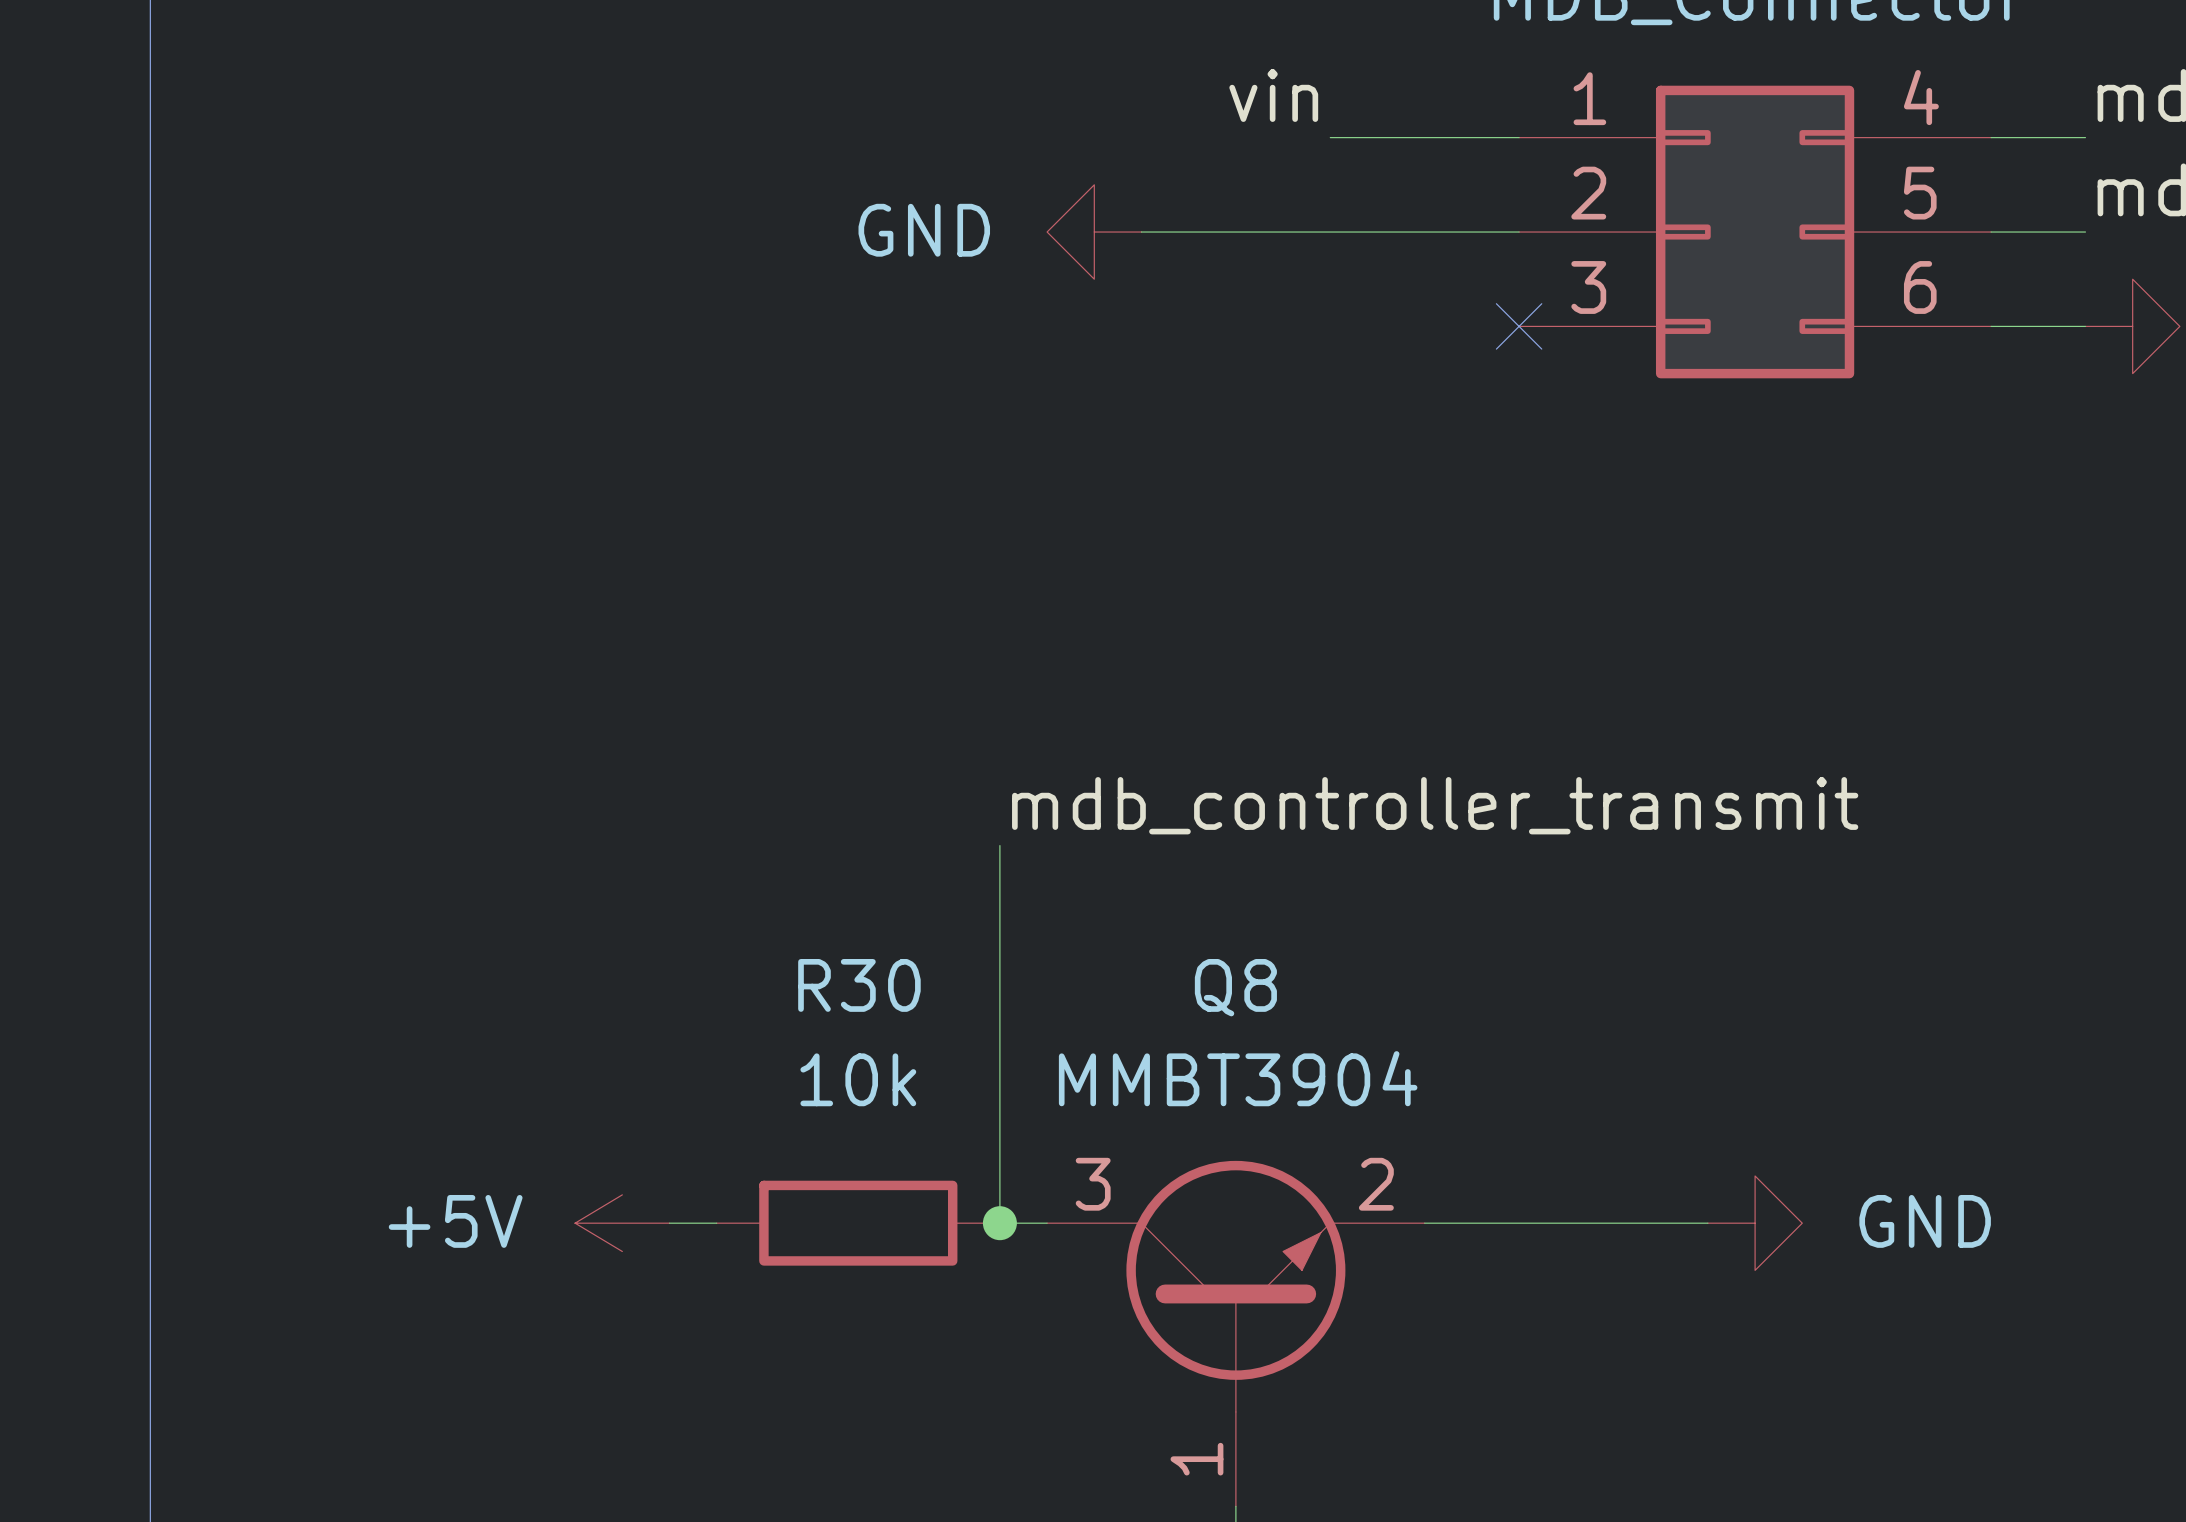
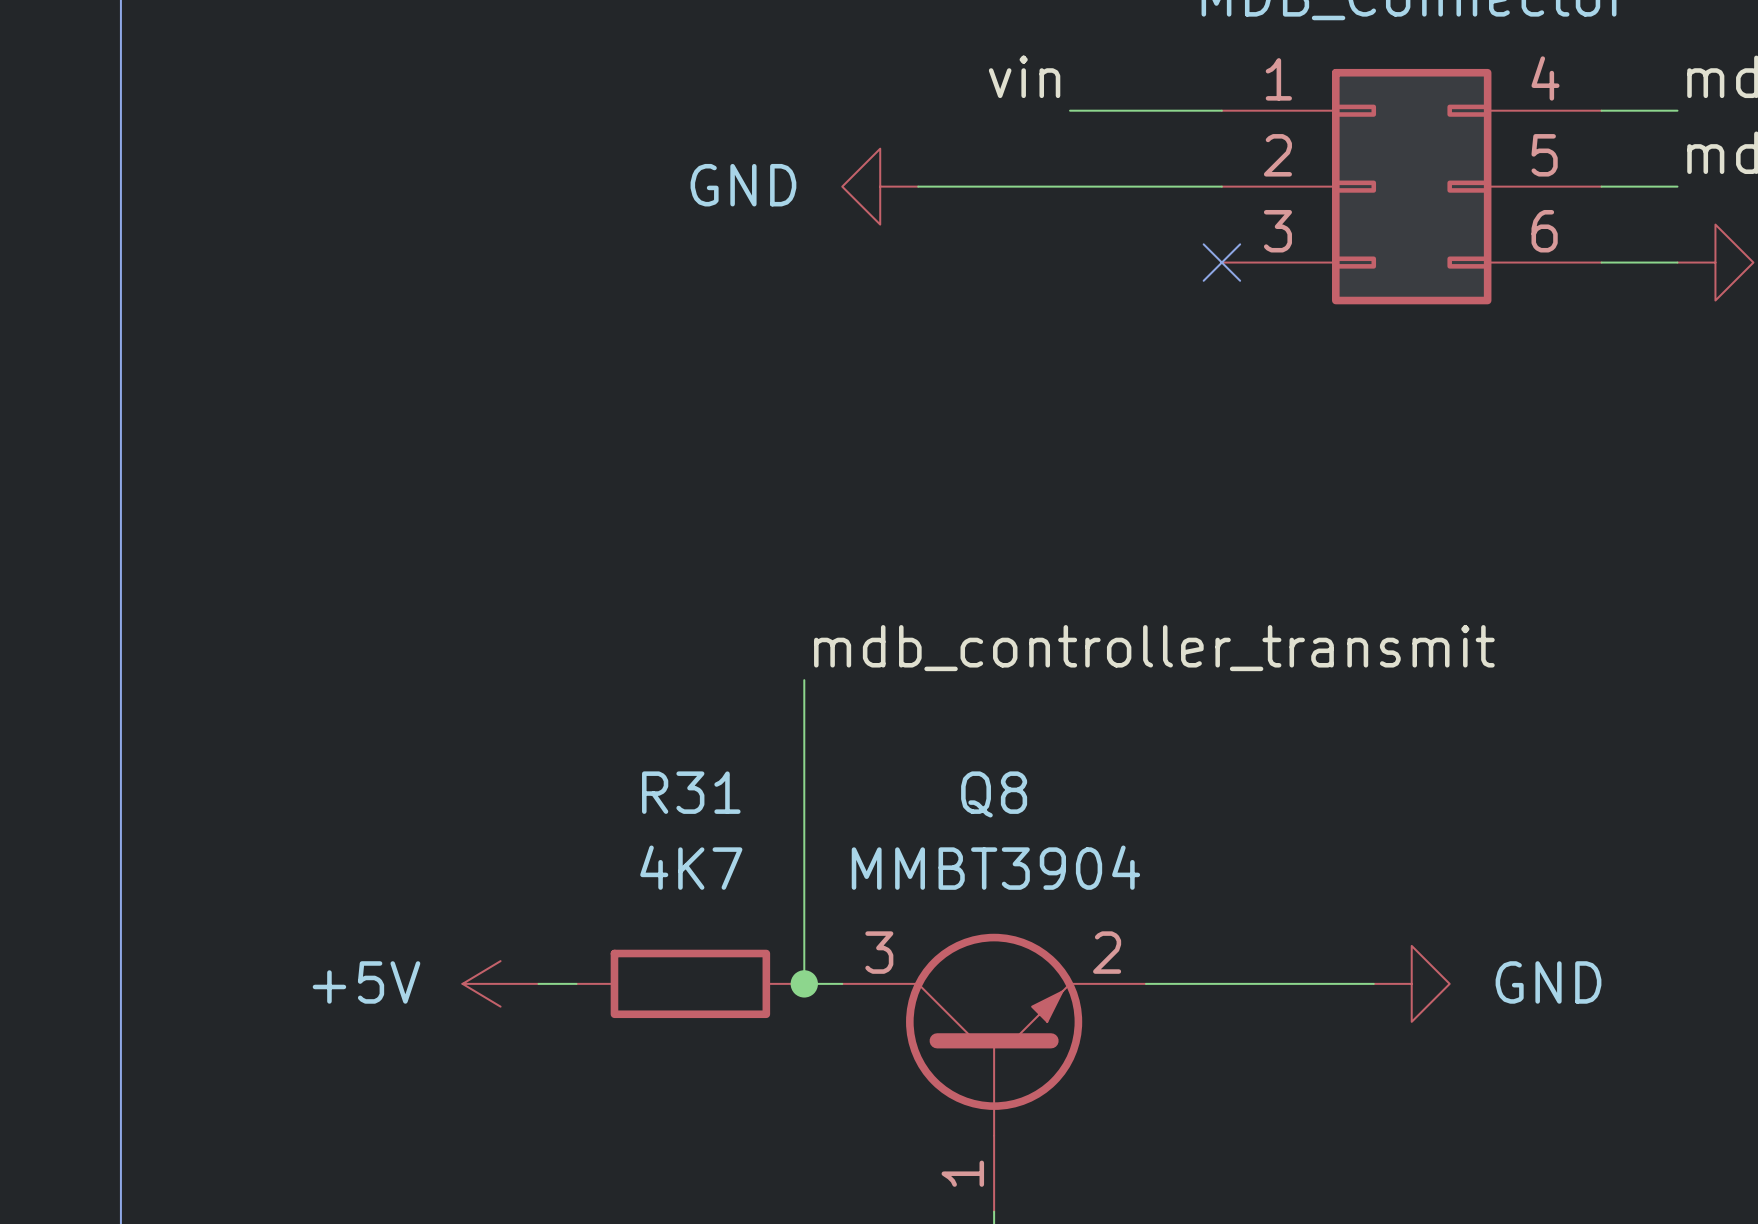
R30 name: R30 (859, 985) -> R31 (691, 792)
R30 value: 10k (858, 1079) -> 4K7 (691, 867)

